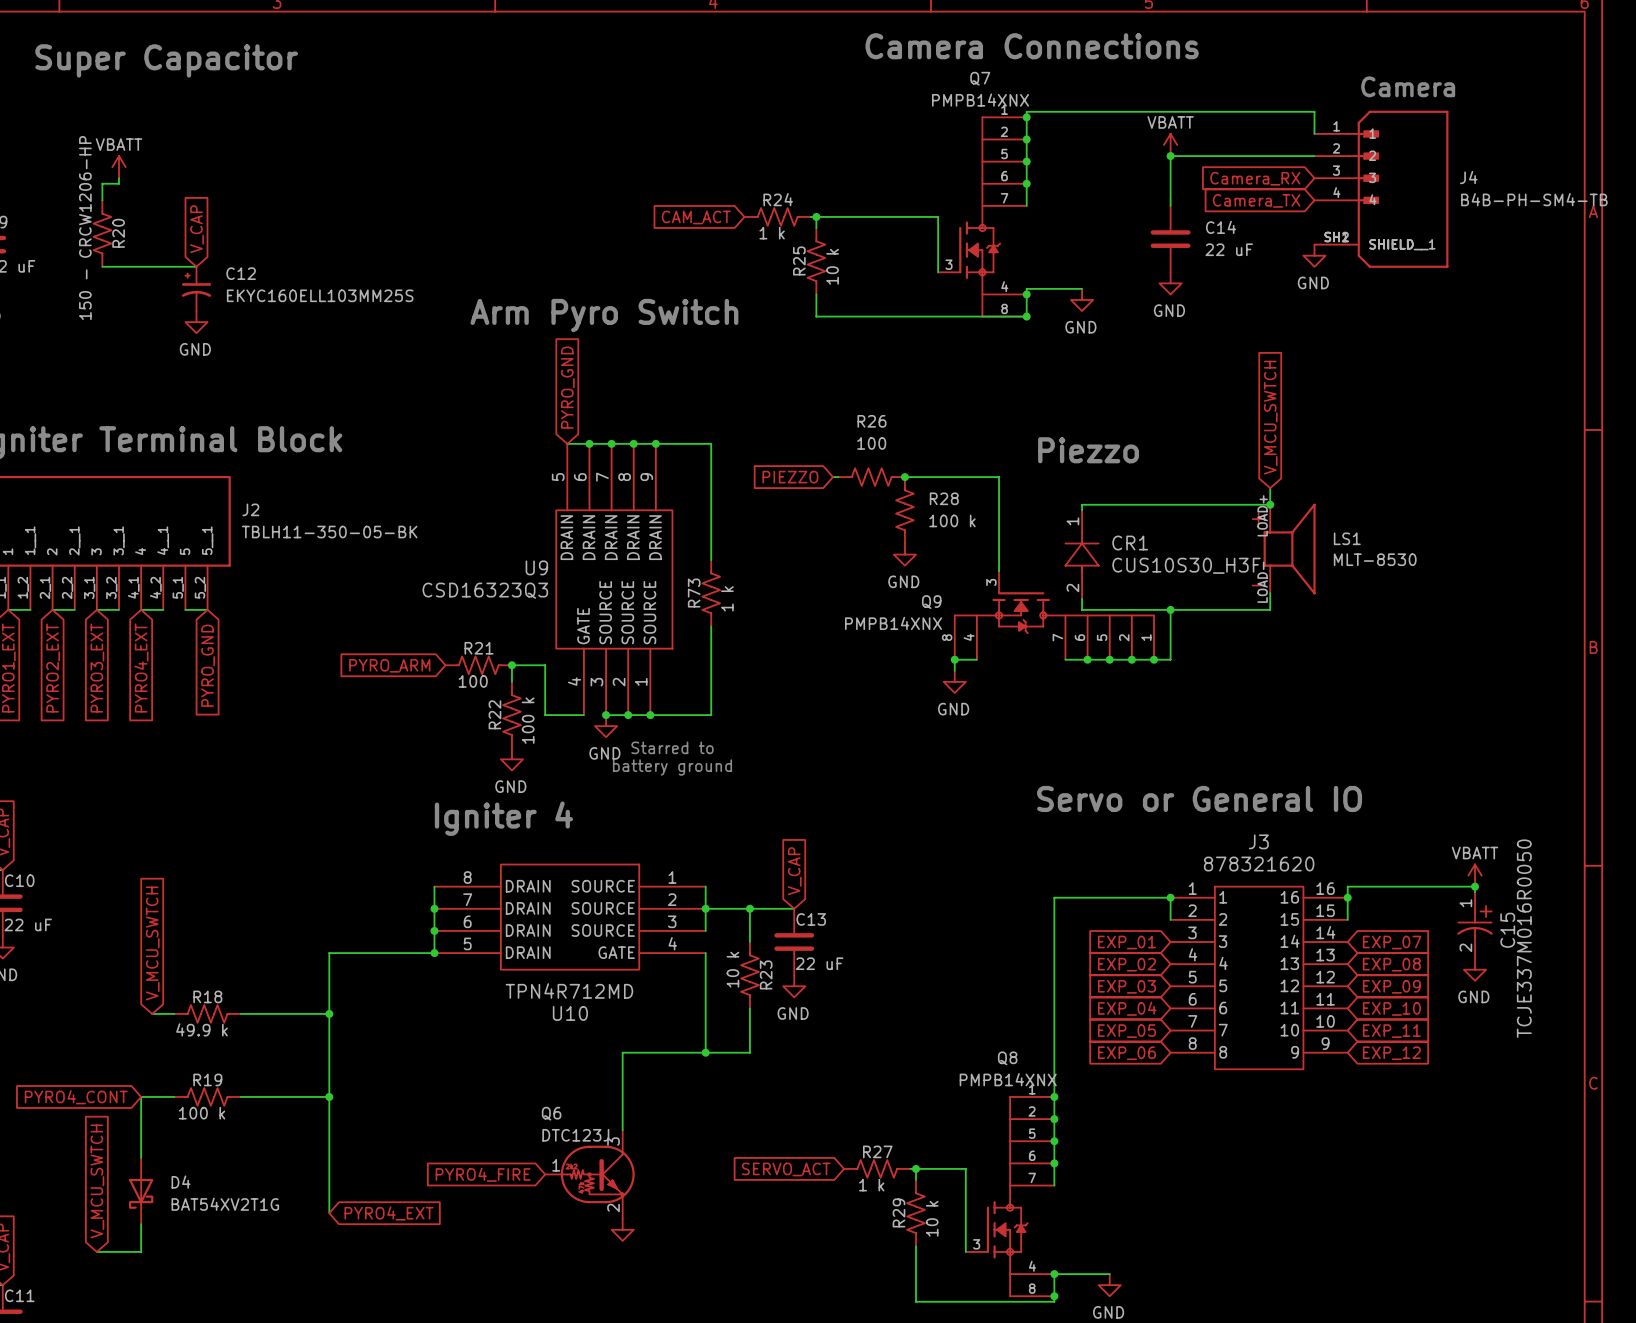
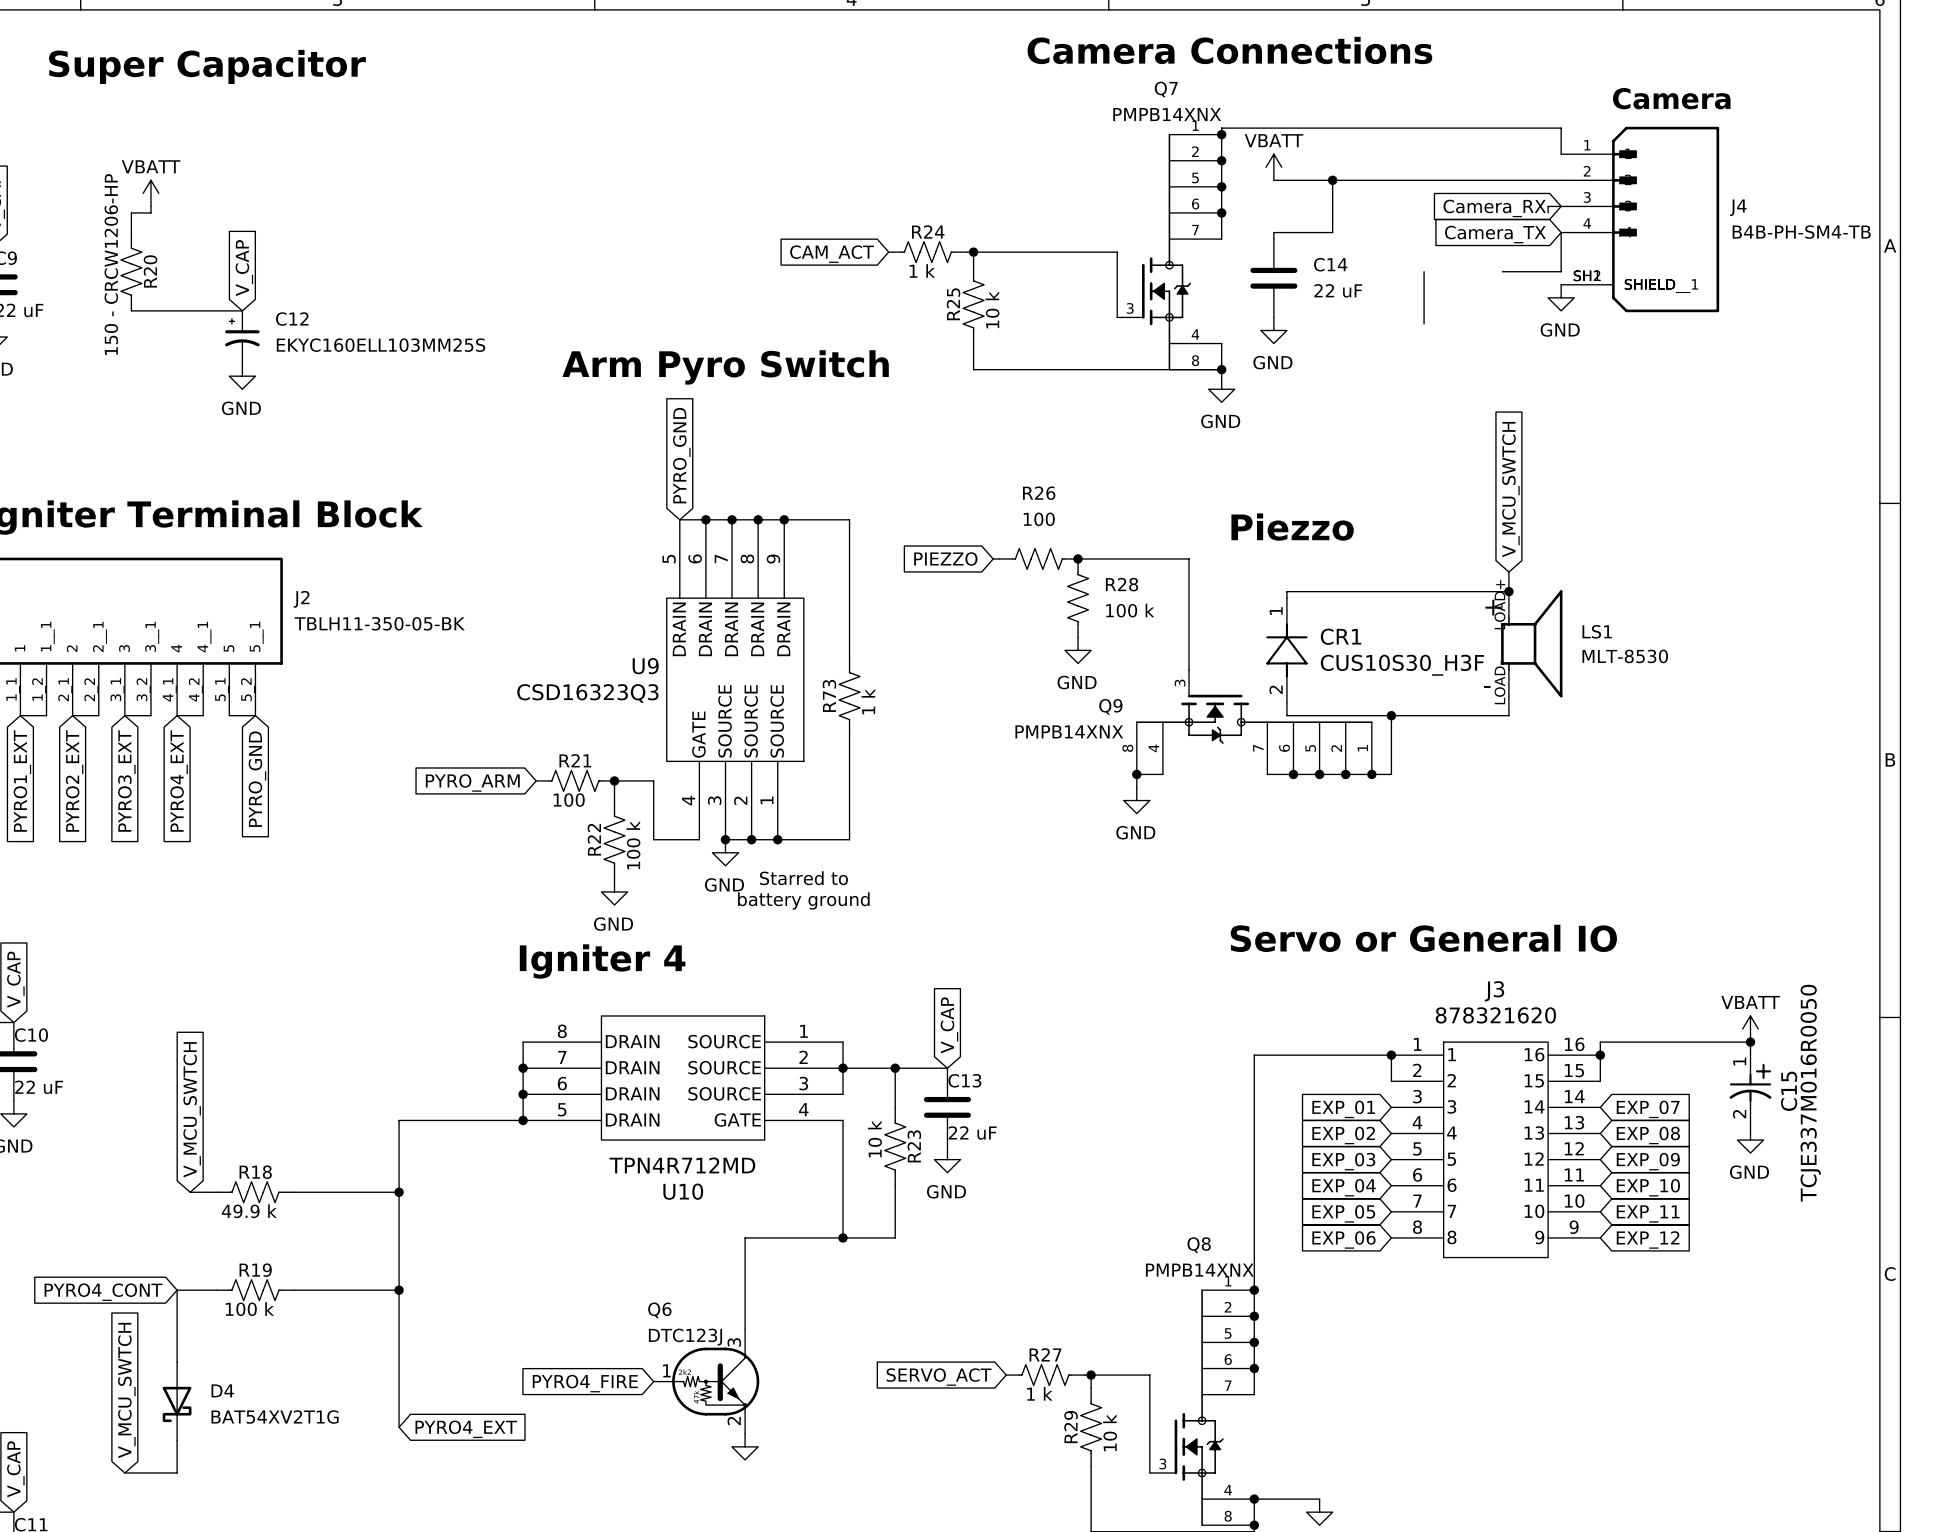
power symbol position: VBATT (1170, 145) -> VBATT (1273, 167)
wire: none -> (1332, 180) (1332, 232) (1273, 232) (1273, 239)
wire: (1170, 156) (1170, 205) -> (1391, 180) (1273, 180)
junction position: (1170, 156) -> (1332, 180)
wire: none -> (1561, 206) (1548, 206) (1548, 212)
wire: none -> (1561, 232) (1561, 271) (1502, 271)
wire: none -> (1424, 271) (1424, 323)
C14 position: (1170, 239) -> (1273, 278)
power symbol: GND (1170, 283) -> none
wire: (1082, 288) (1026, 288) (1026, 294) -> none
junction: (1026, 294) -> none
power symbol position: GND (1082, 299) -> GND (1273, 330)
power symbol: none -> GND (1221, 389)

